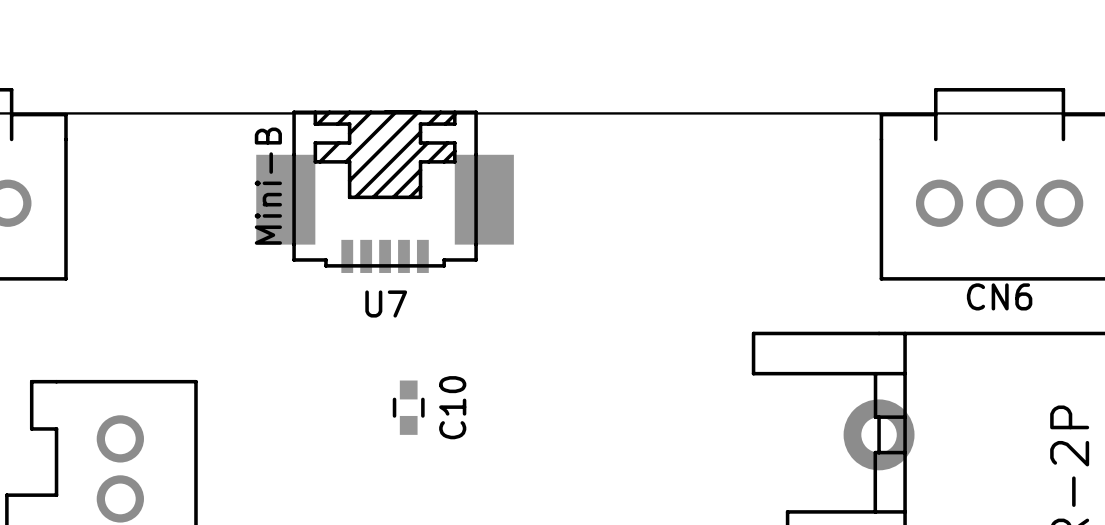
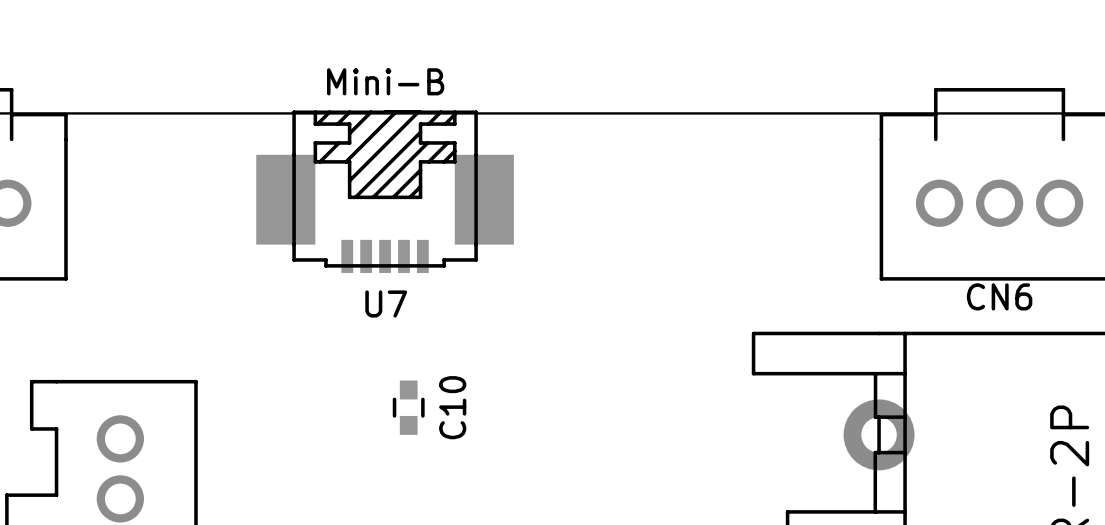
U7 value rotation: 0° (268, 186) -> 90° clockwise (385, 81)

